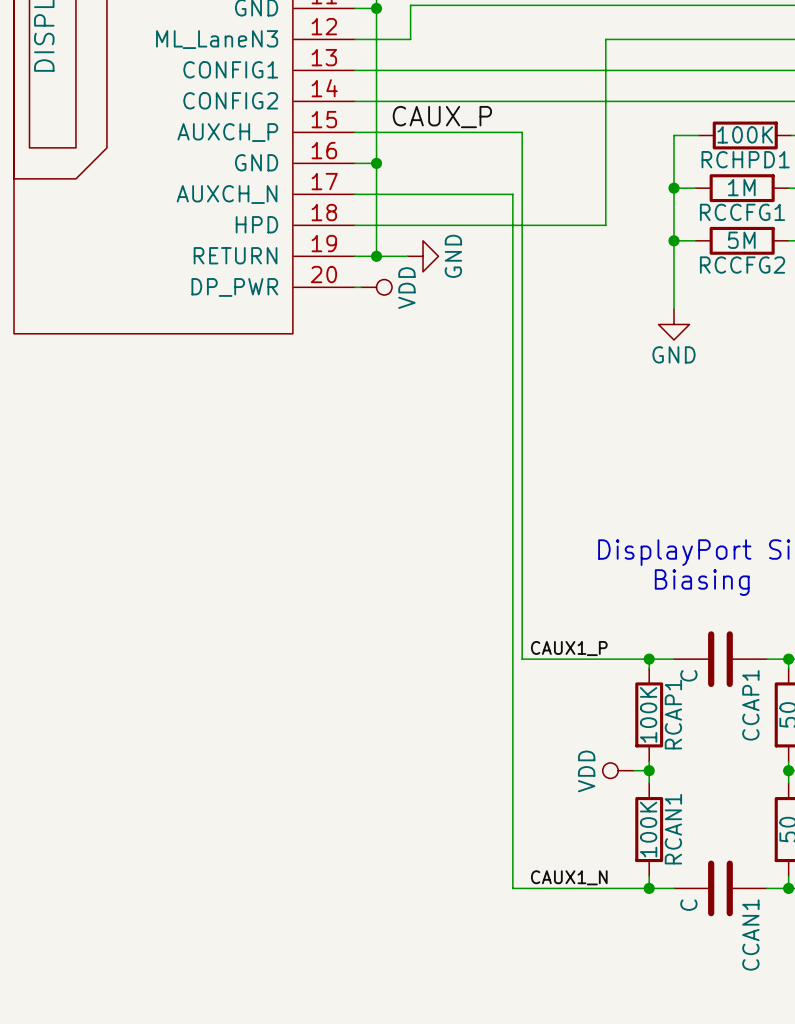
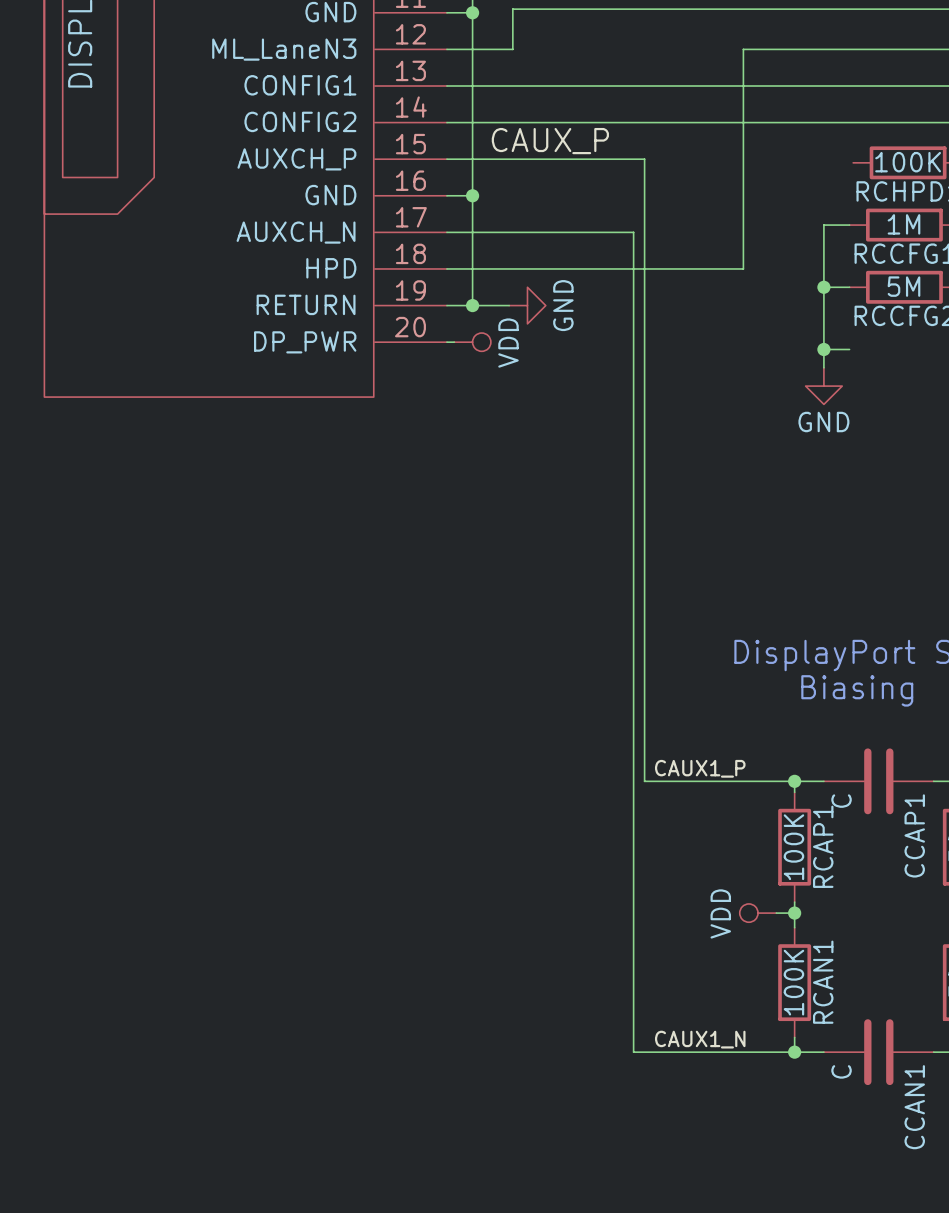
wire: (698, 135) (673, 135) (673, 188) -> none
junction: (673, 188) -> none
wire: none -> (823, 349) (849, 349)
junction: none -> (823, 349)

